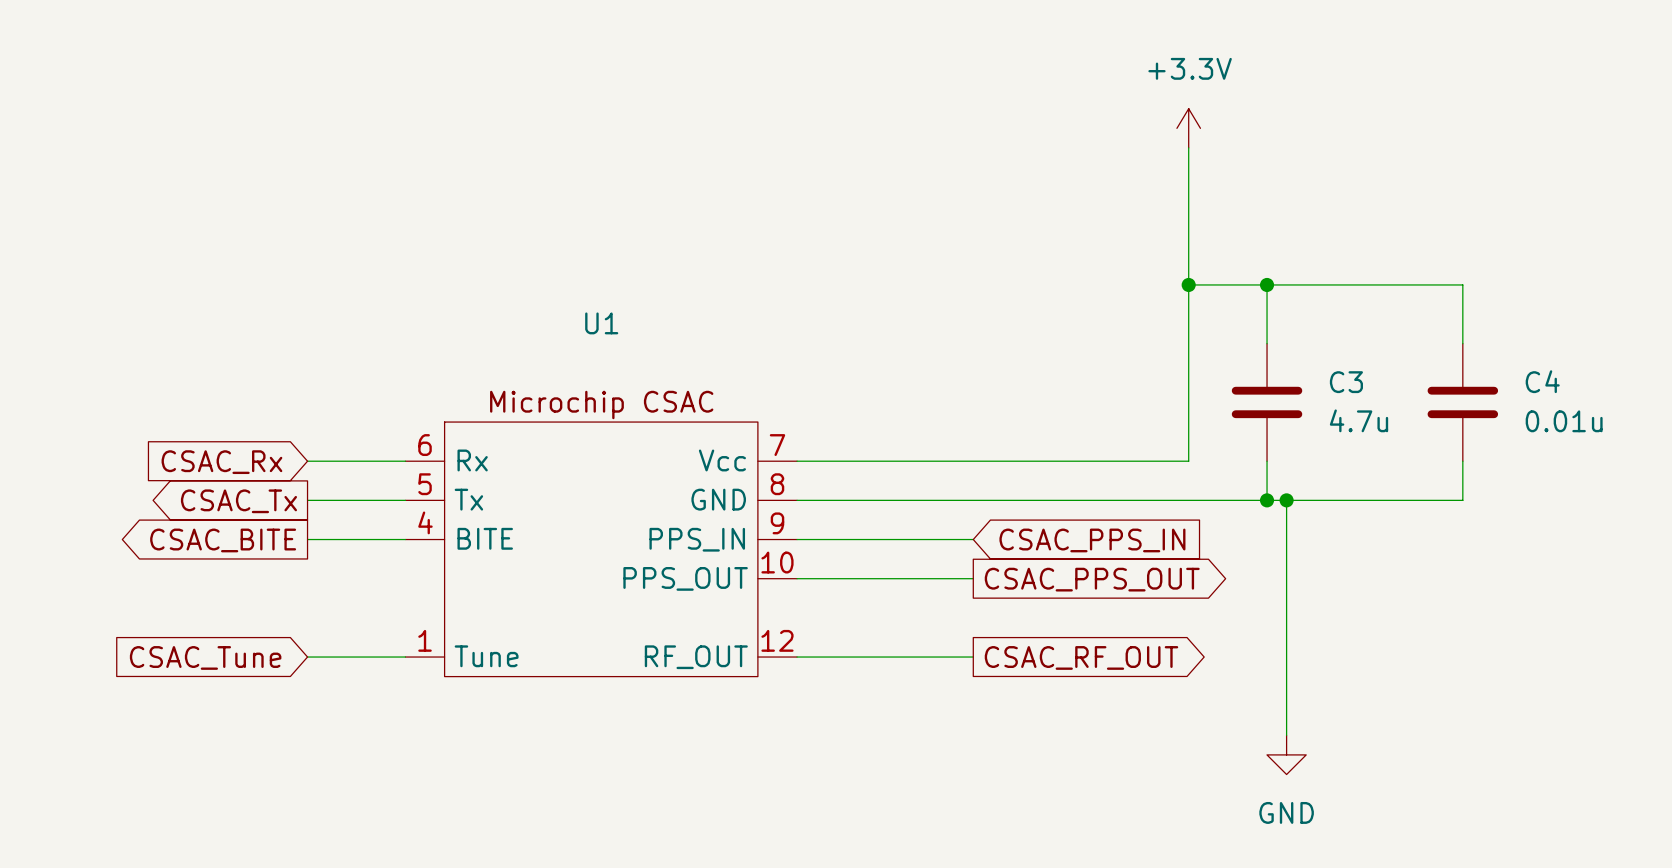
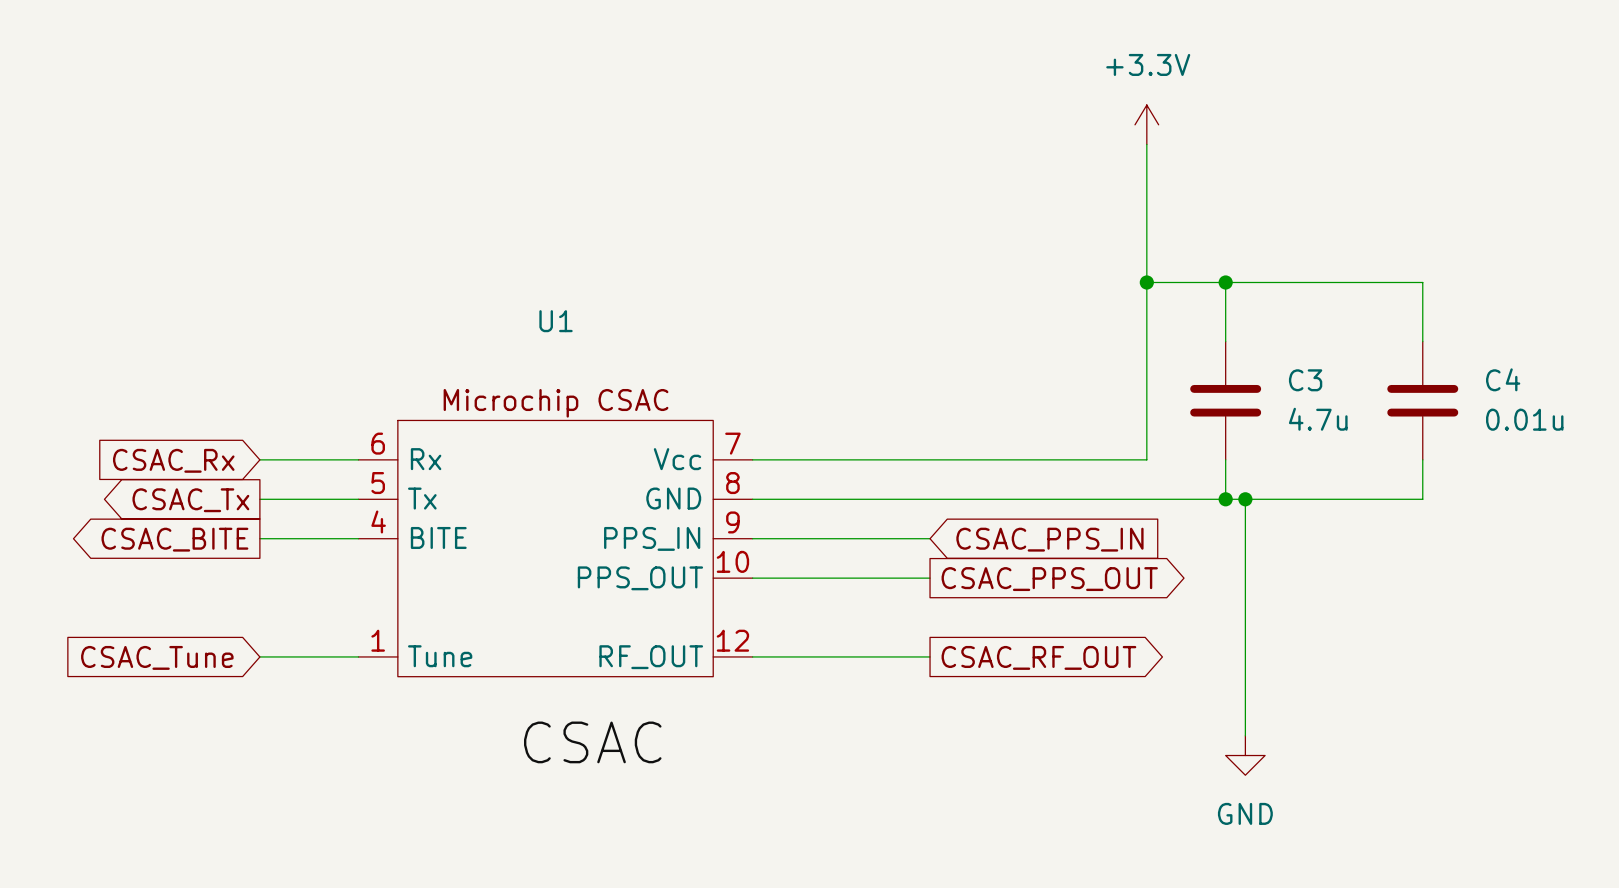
label: none -> CSAC (592, 742)

